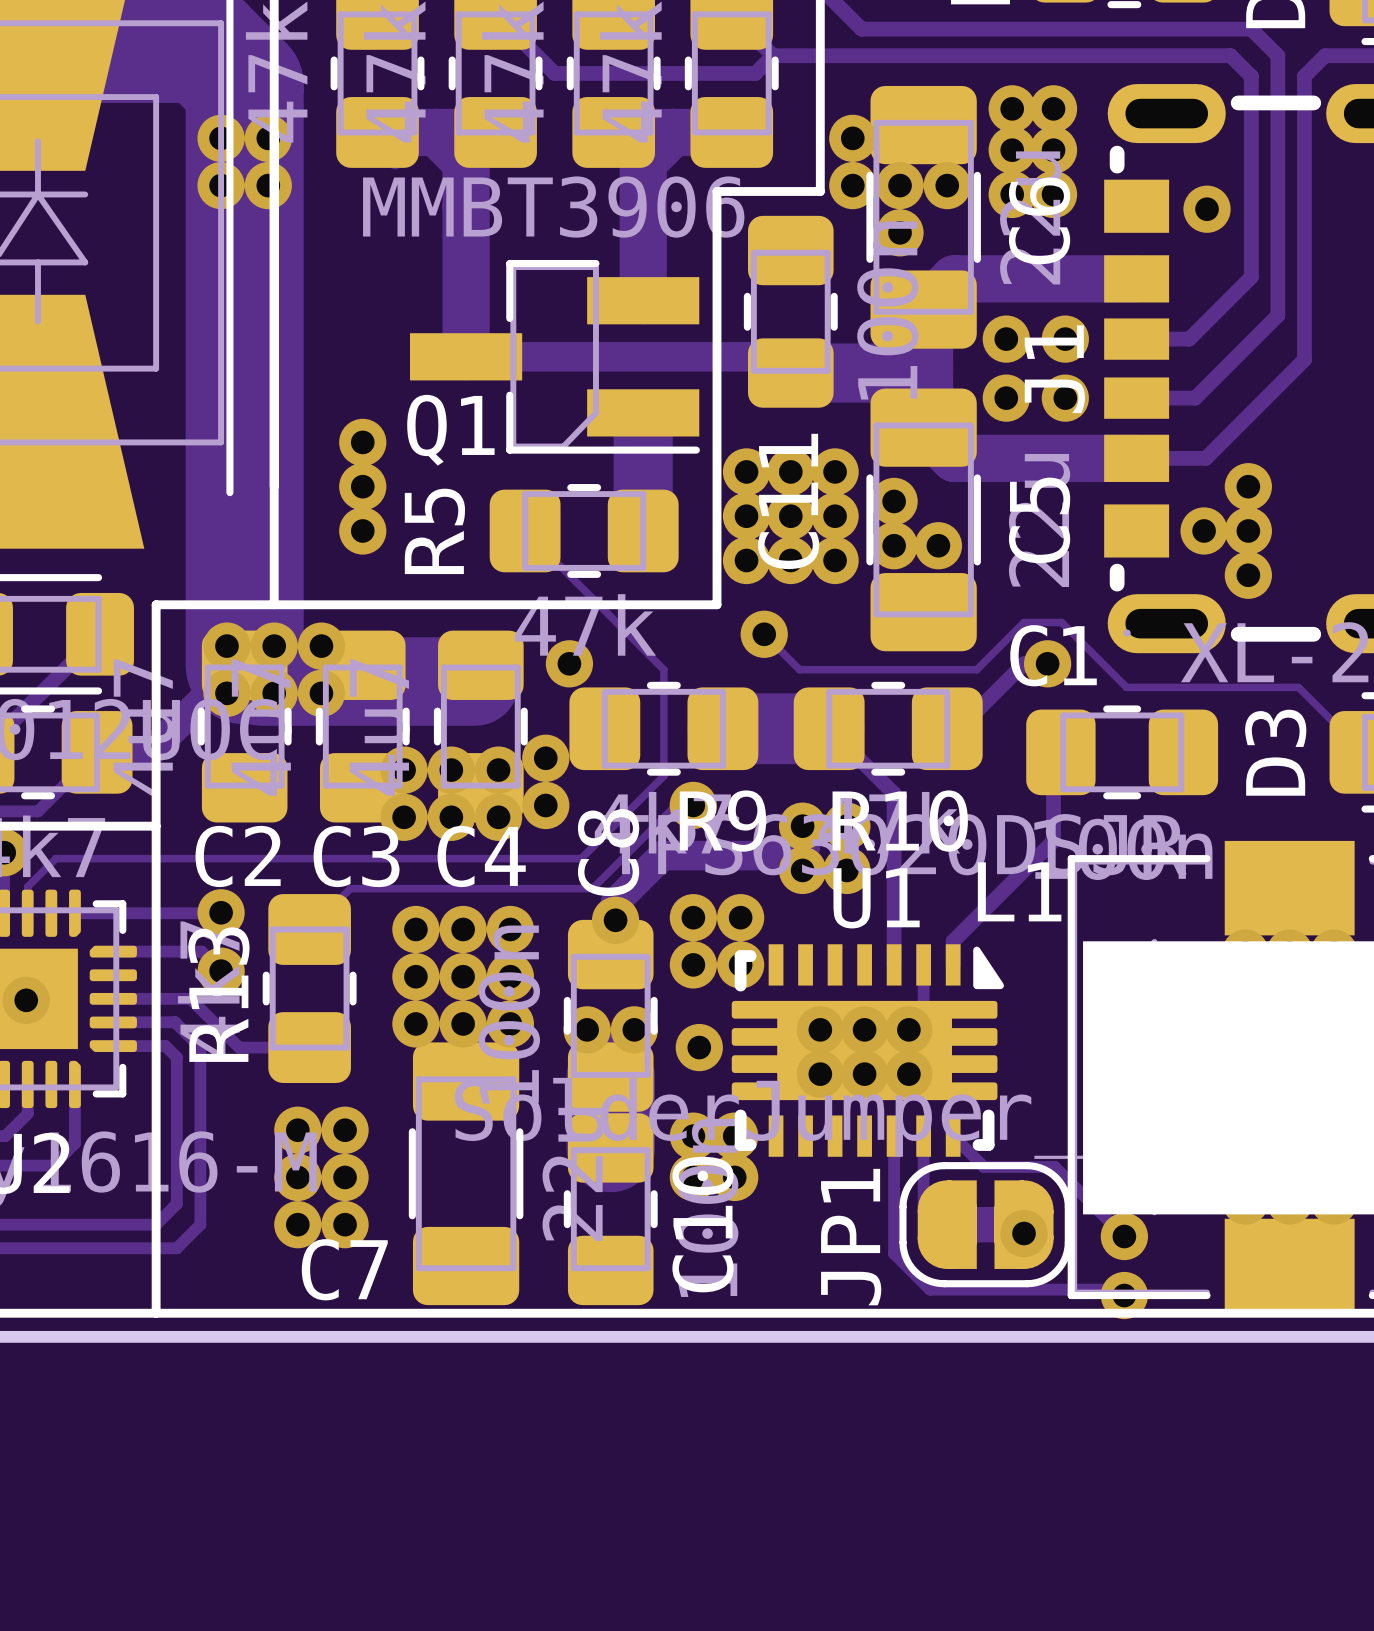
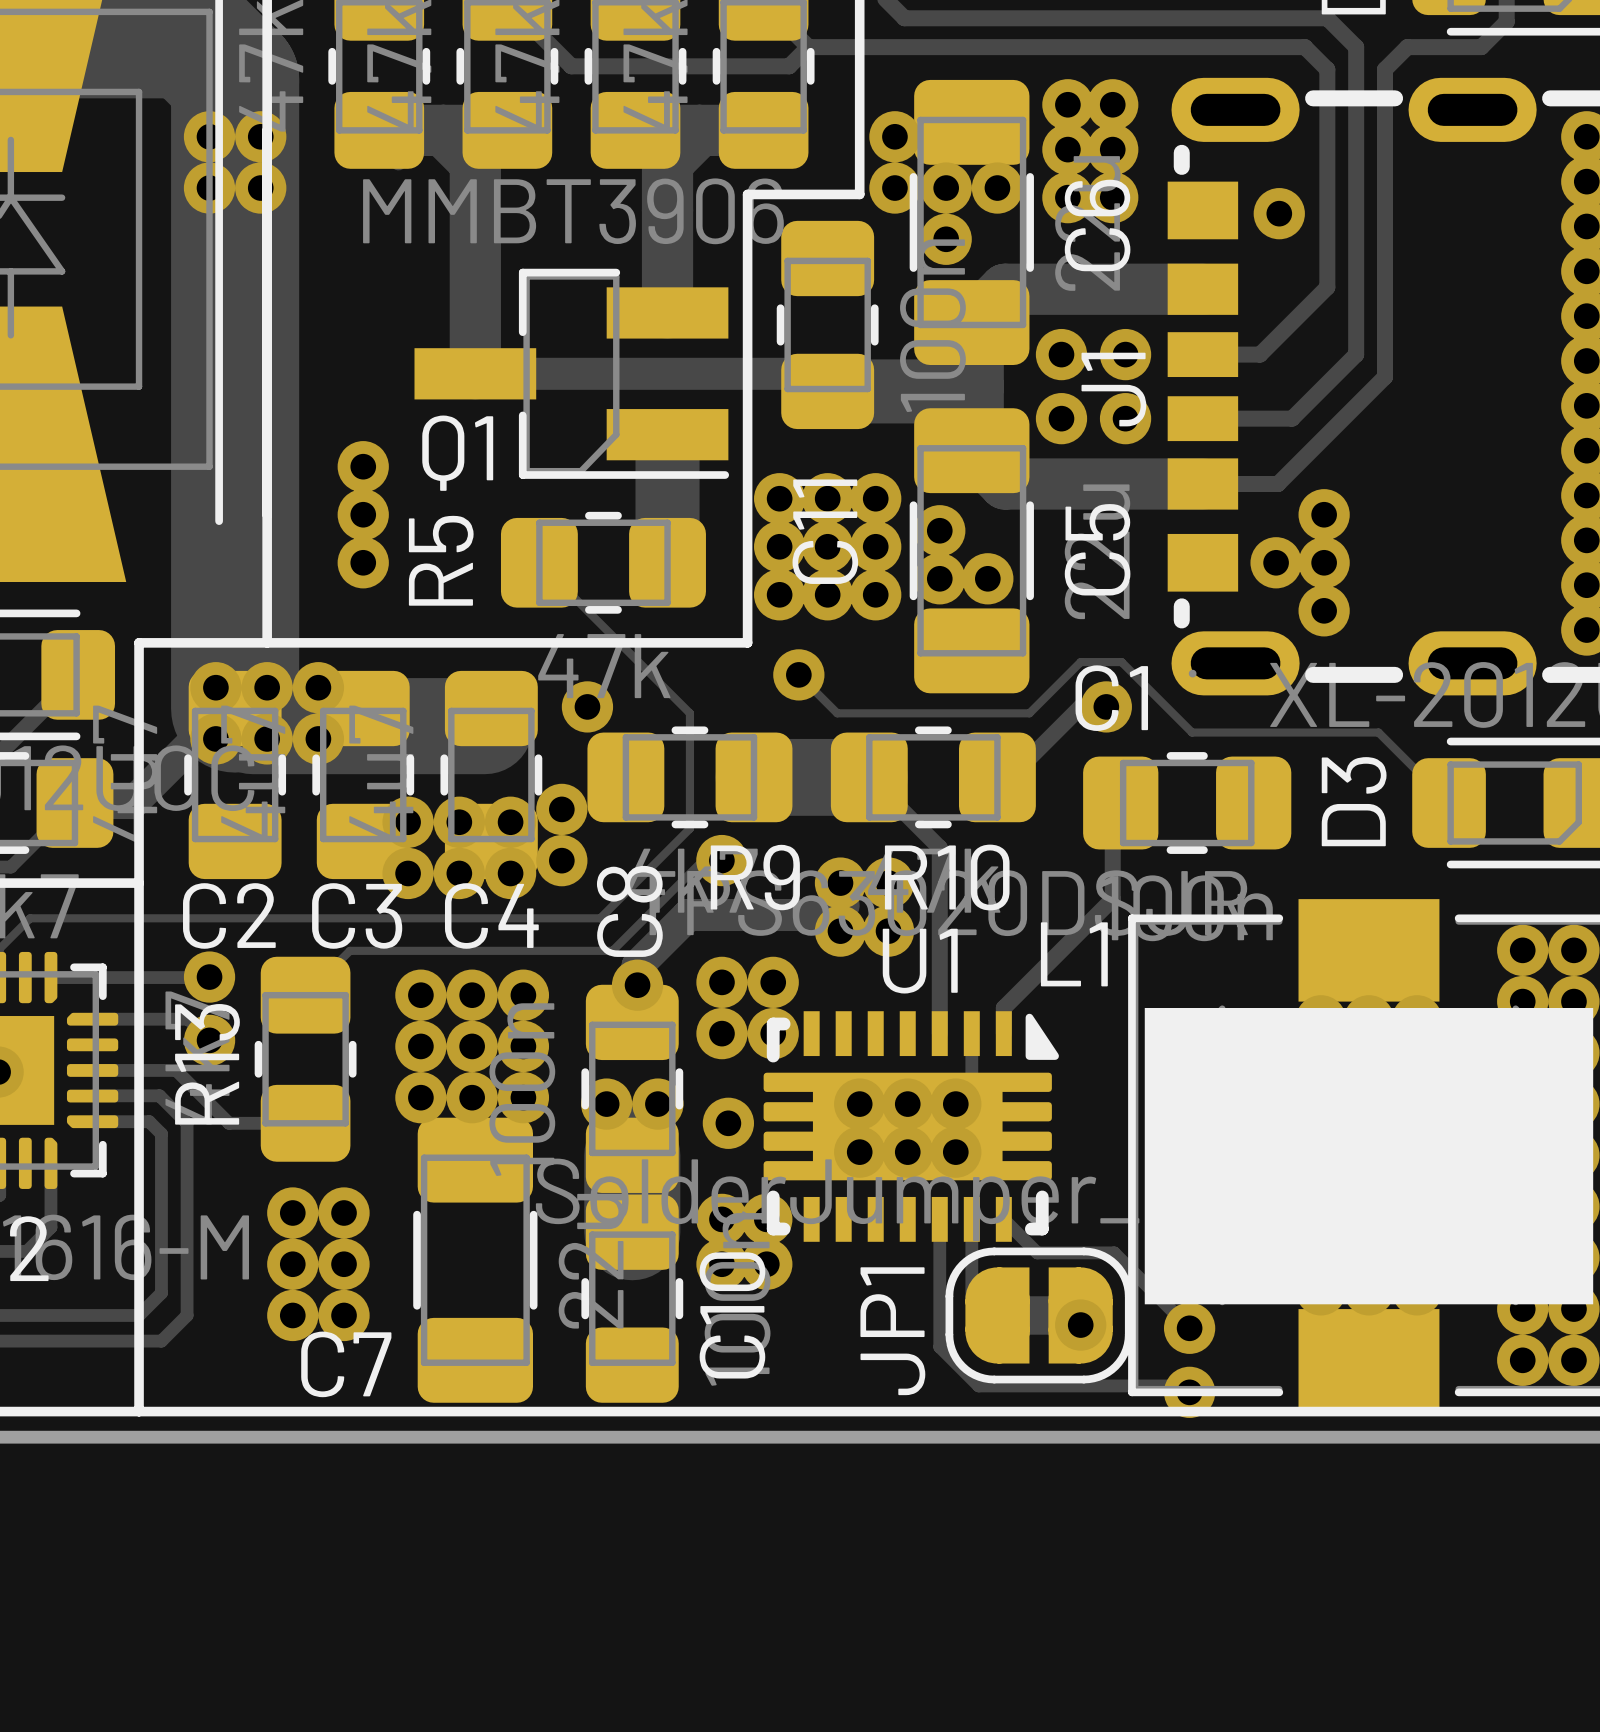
track: (1277, 315) (1195, 398) -> (1356, 328) (1356, 354) (1292, 418) (1266, 418)

